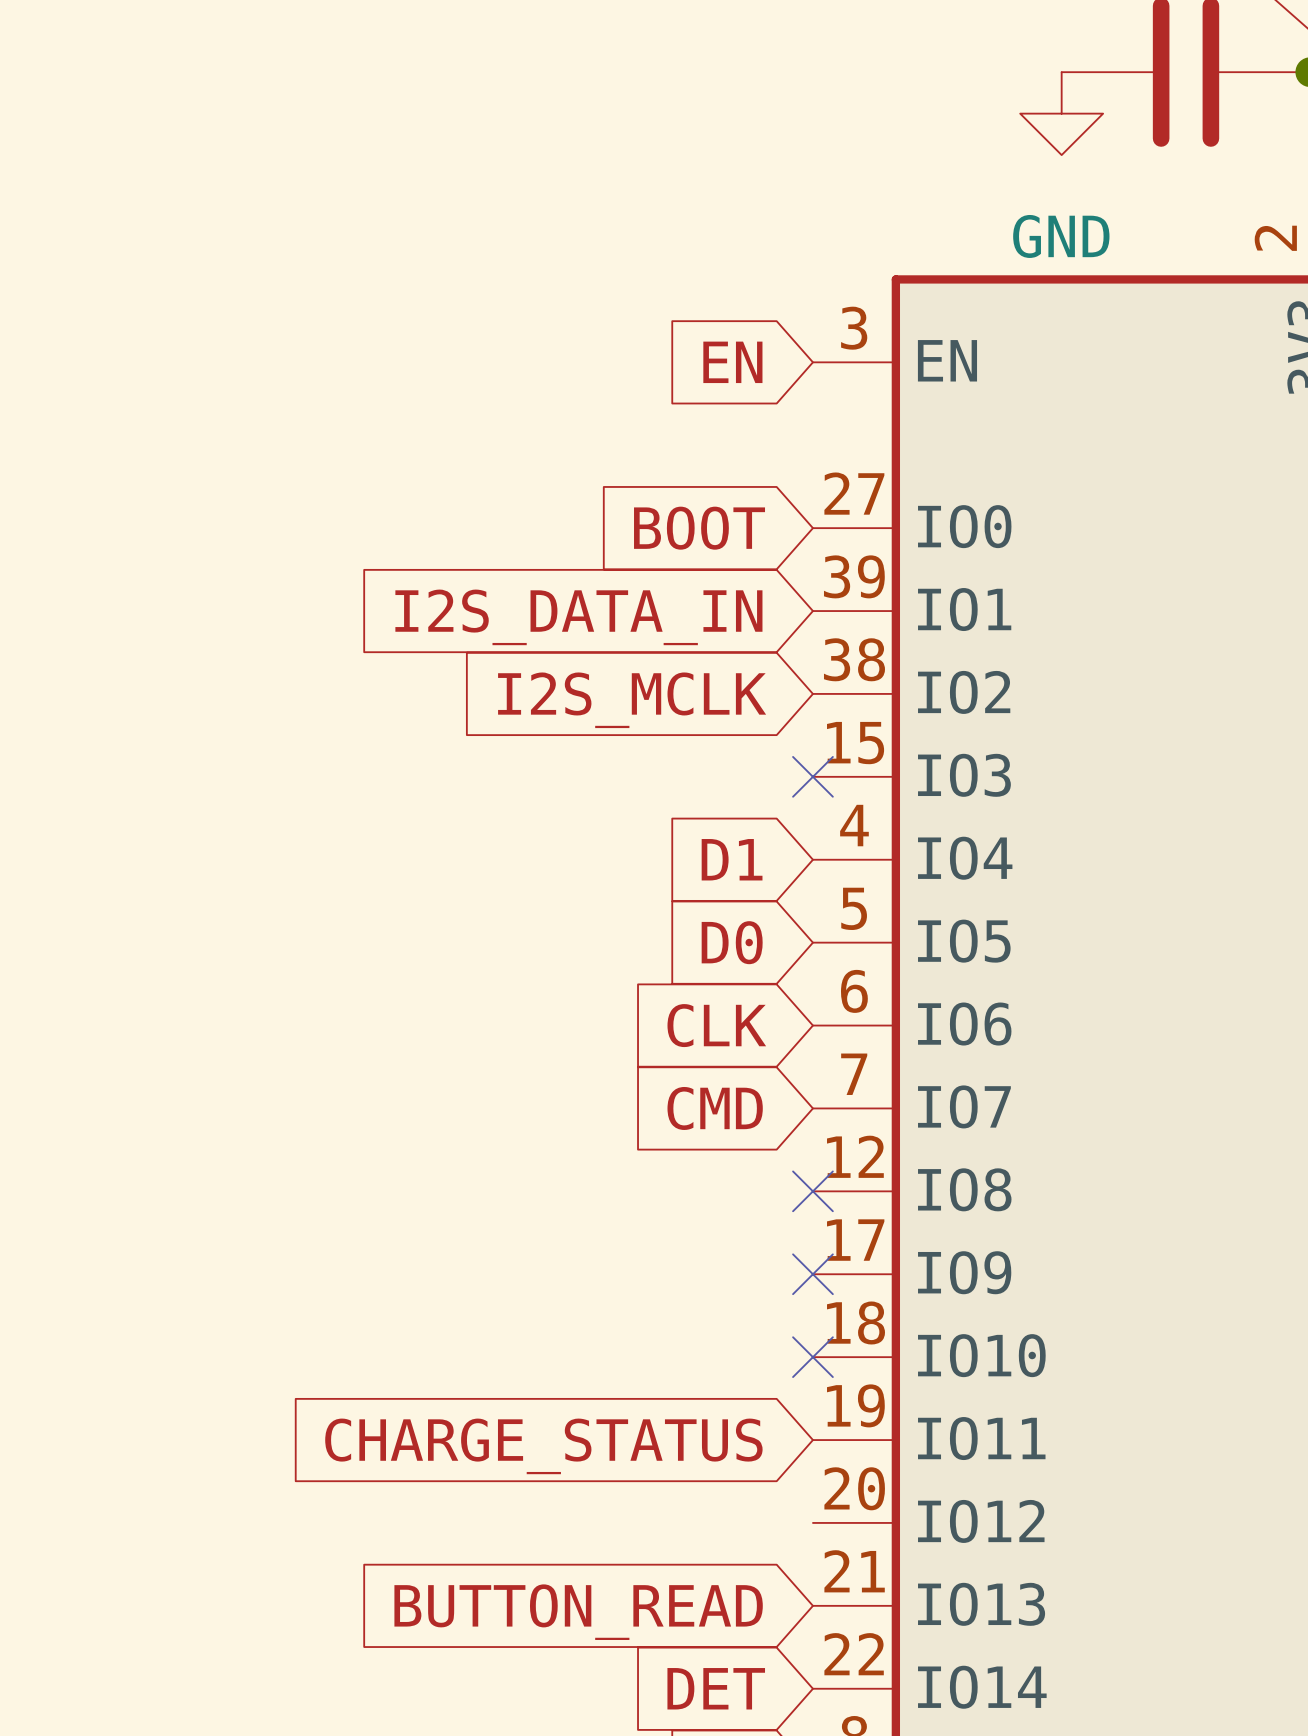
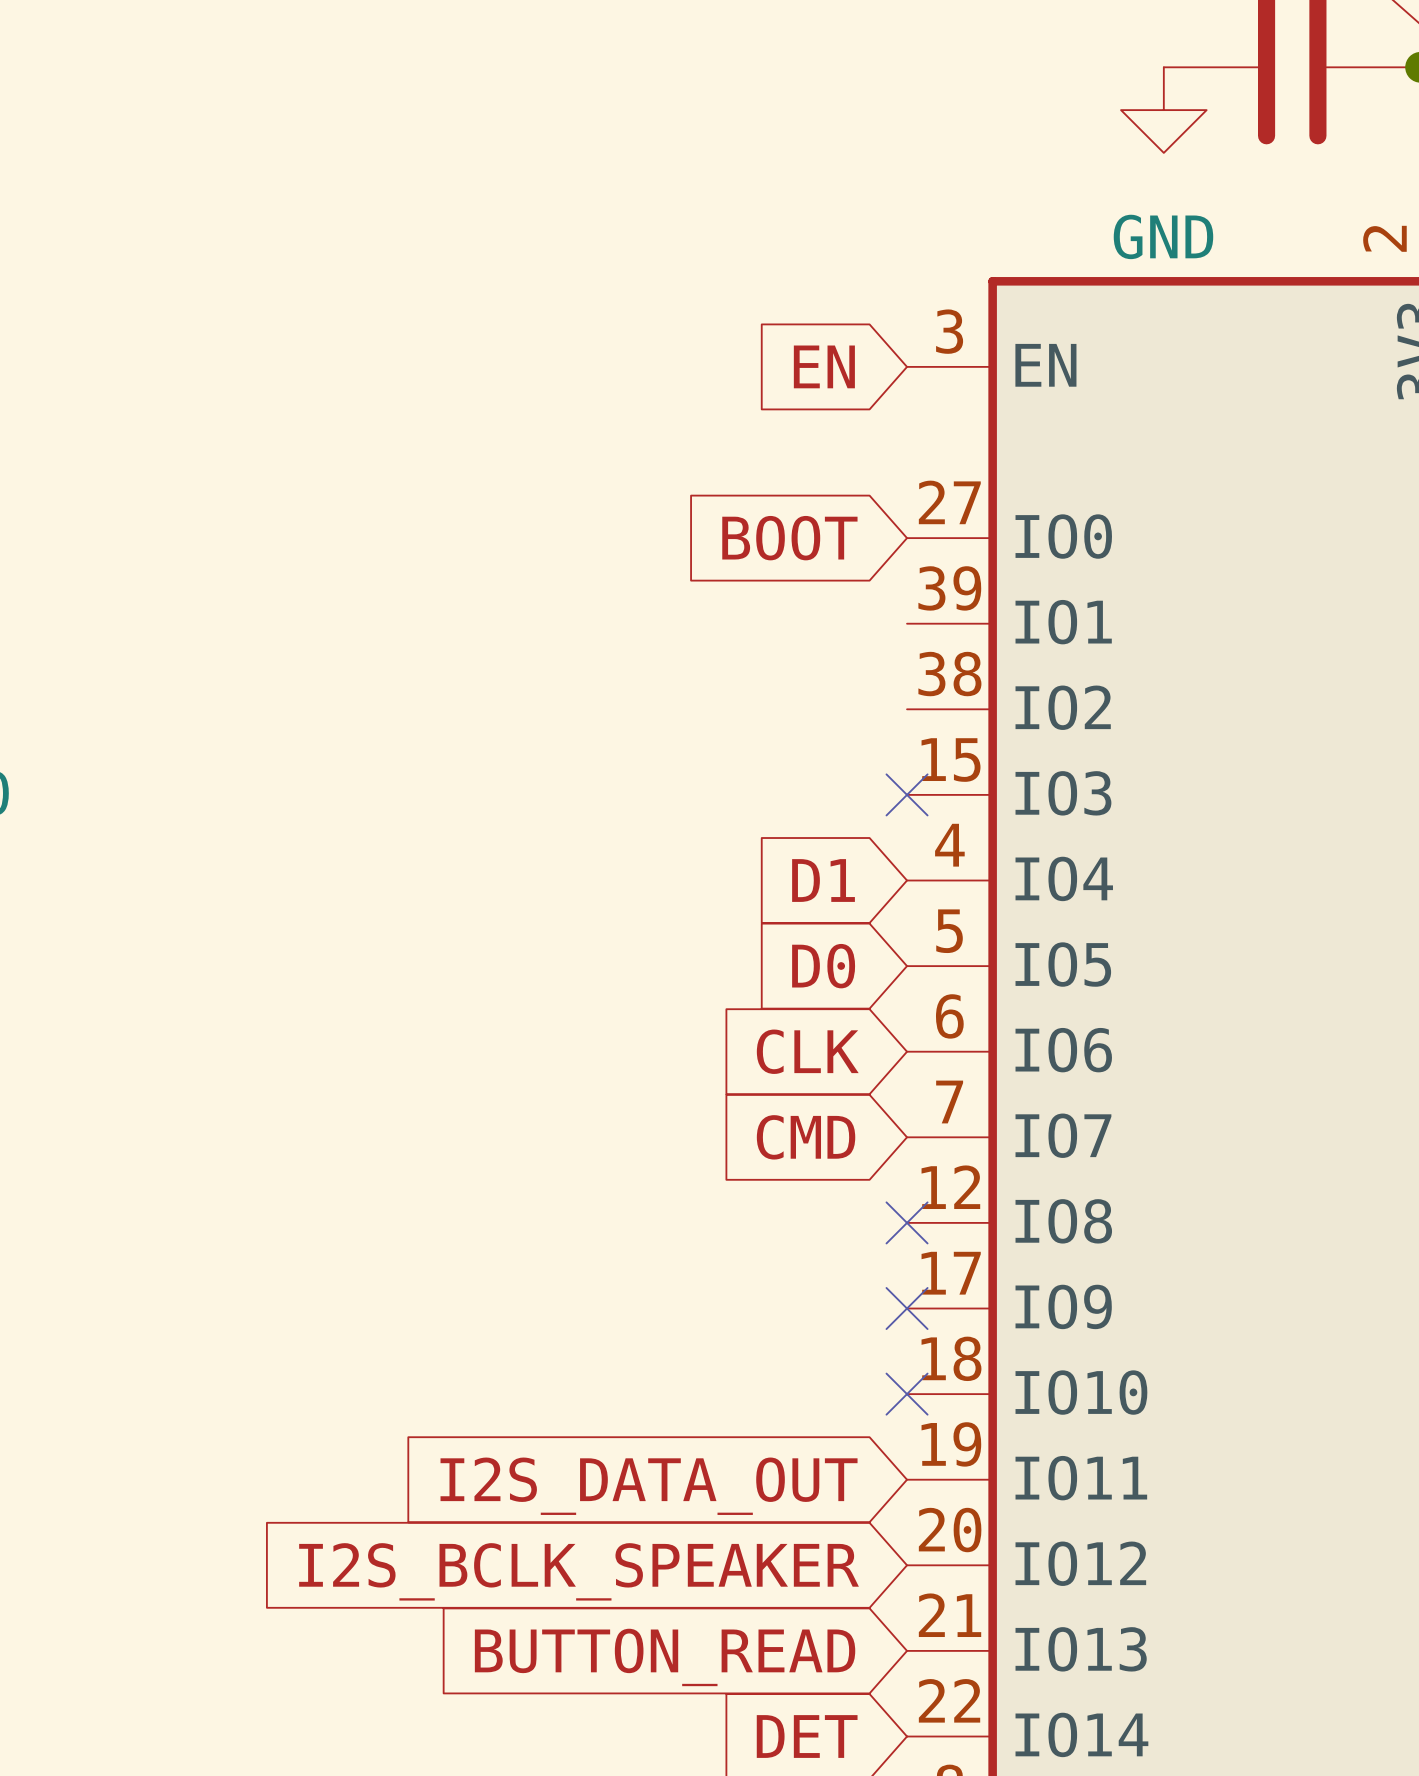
global label: I2S_DATA_IN (578, 617) -> none
global label: I2S_MCLK (632, 700) -> none
global label: CHARGE_STATUS (543, 1446) -> I2S_DATA_OUT (649, 1486)
global label: none -> I2S_BCLK_SPEAKER (579, 1571)

